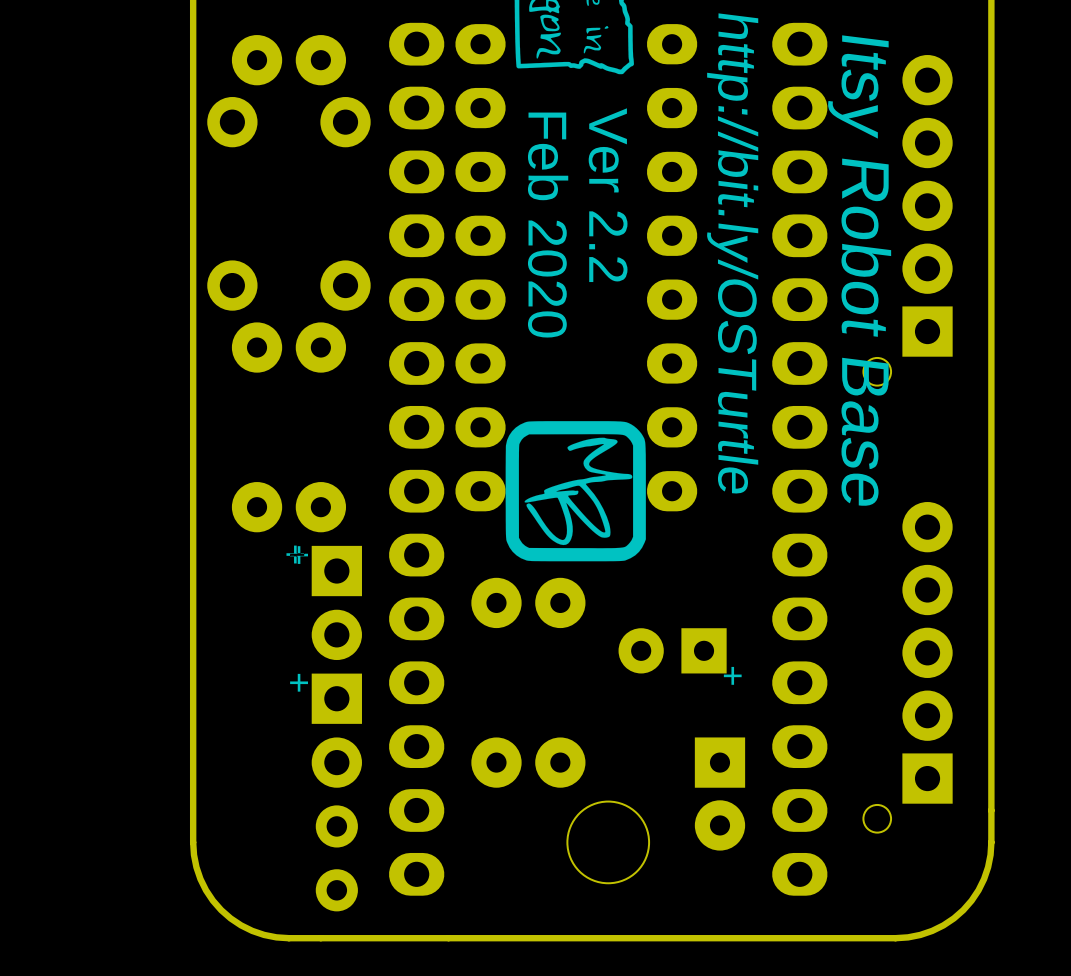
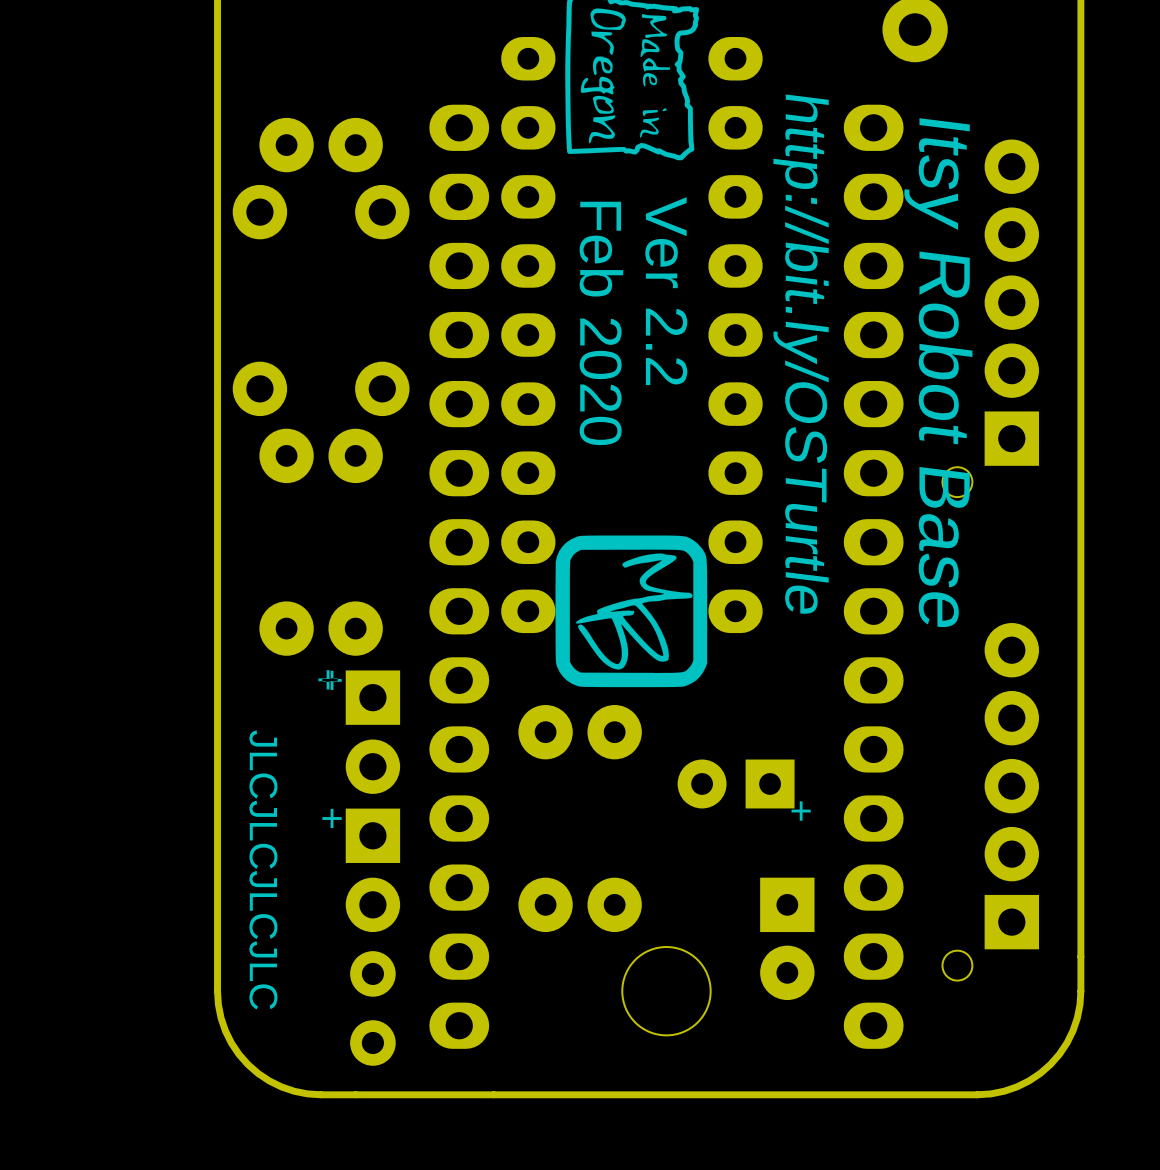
text: none -> JLCJLCJLCJLC (263, 869)

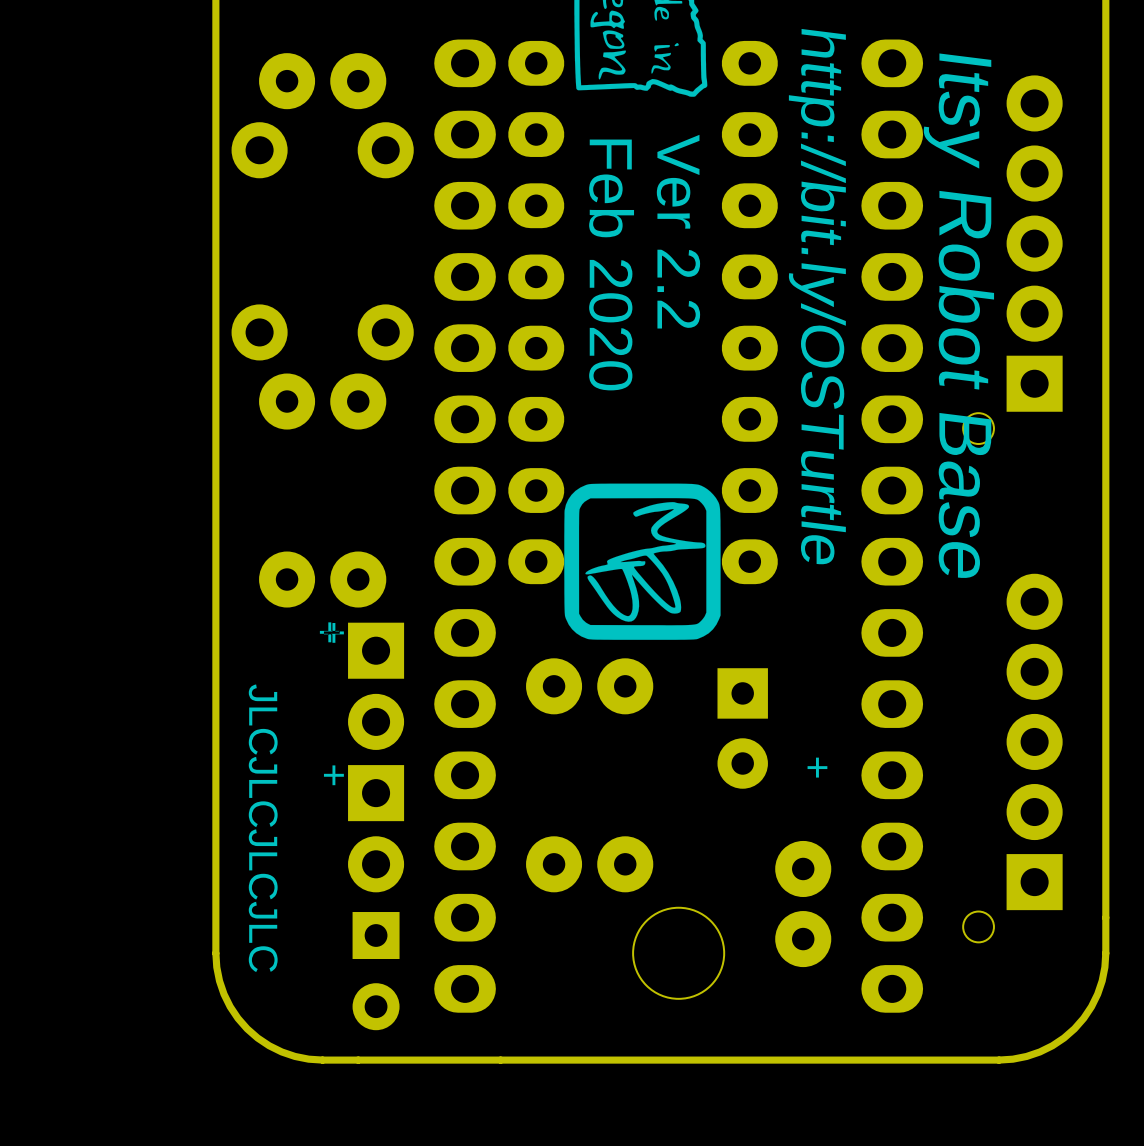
part rotation: 0° (736, 783) -> 90° counterclockwise (742, 728)
part footprint: [760, 877, 815, 1001] -> [775, 840, 832, 968]
part footprint: [350, 951, 396, 1066] -> [352, 912, 400, 1031]

